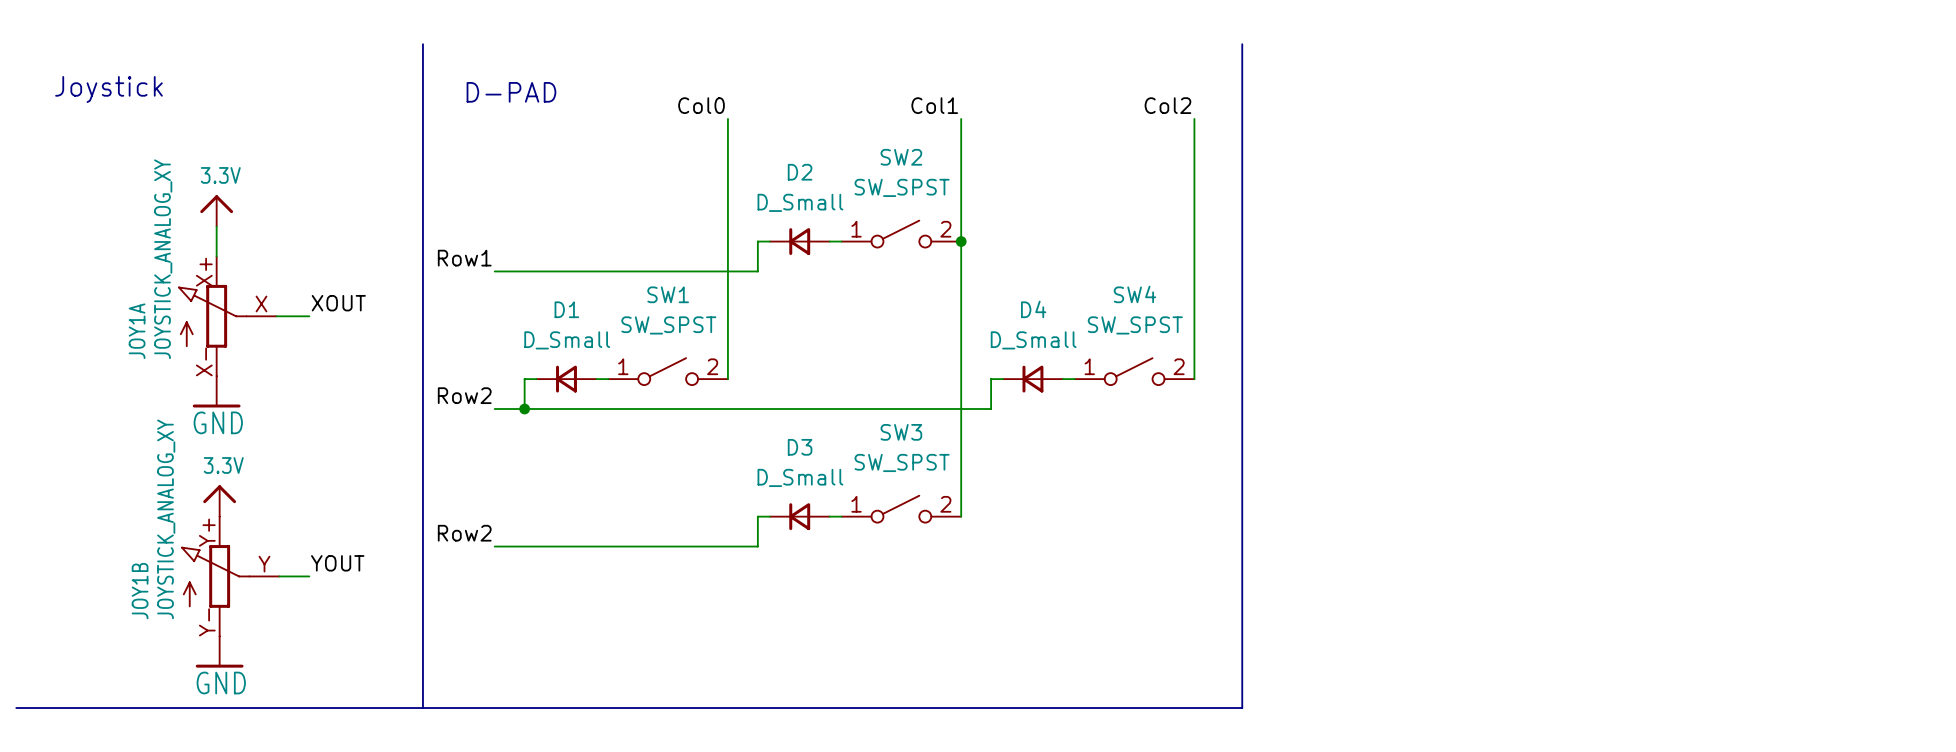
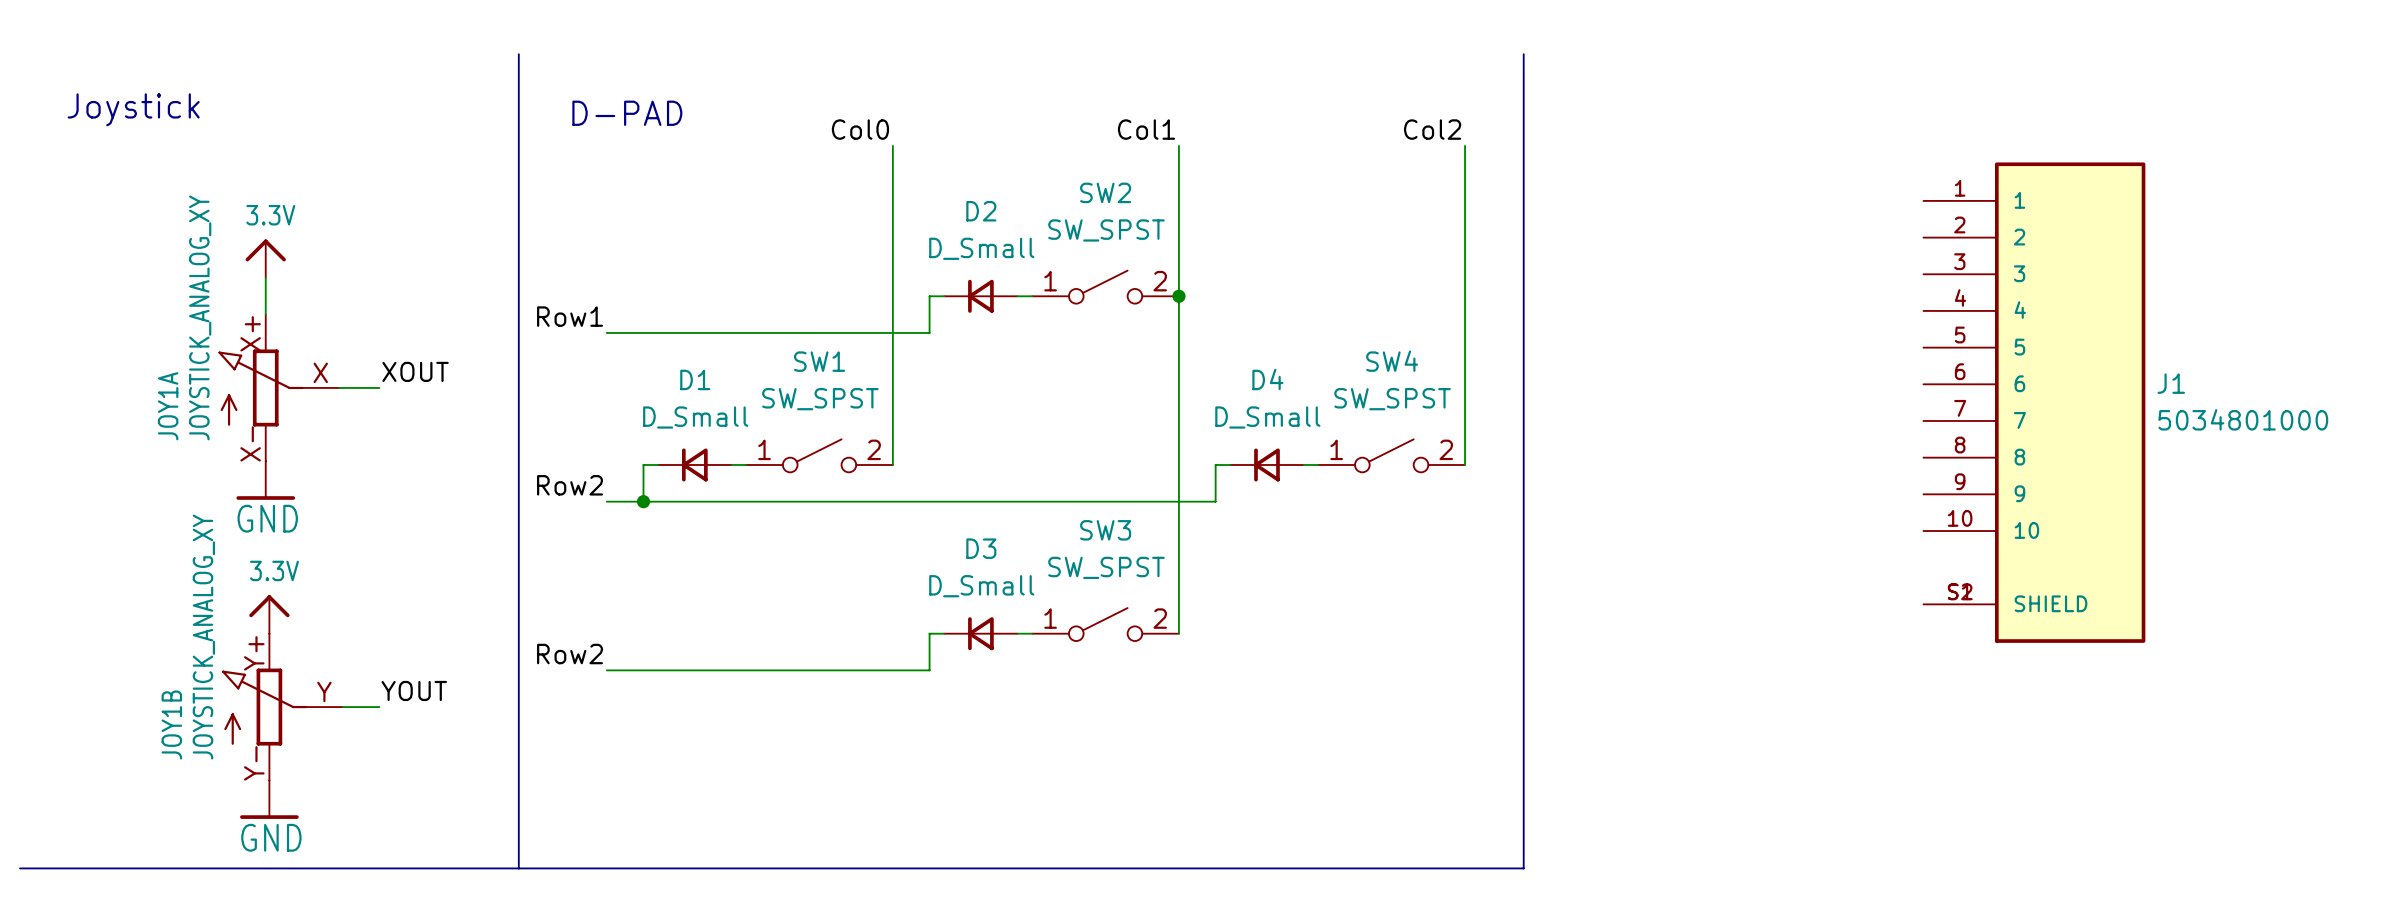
J1: none -> 5034801000 (2034, 402)

